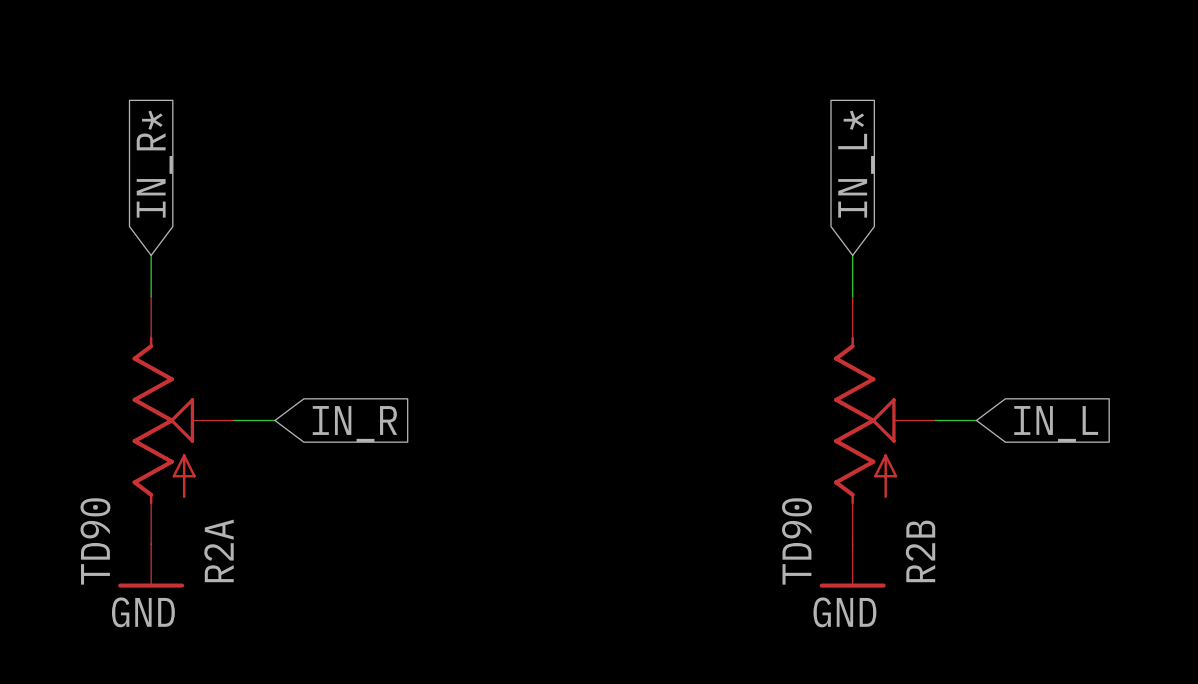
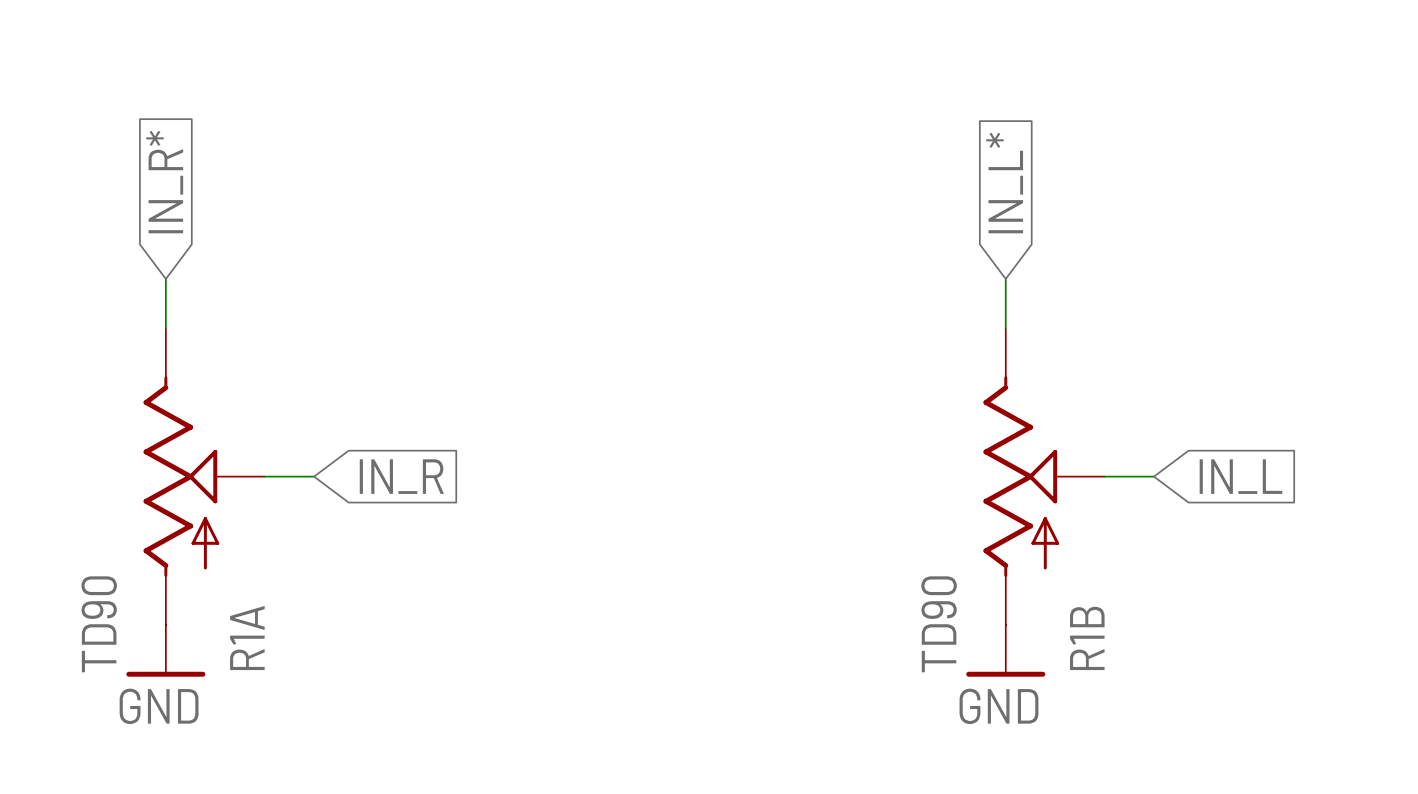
R2A name: R2A (219, 550) -> R1A (247, 638)
R2B name: R2B (920, 551) -> R1B (1087, 638)

